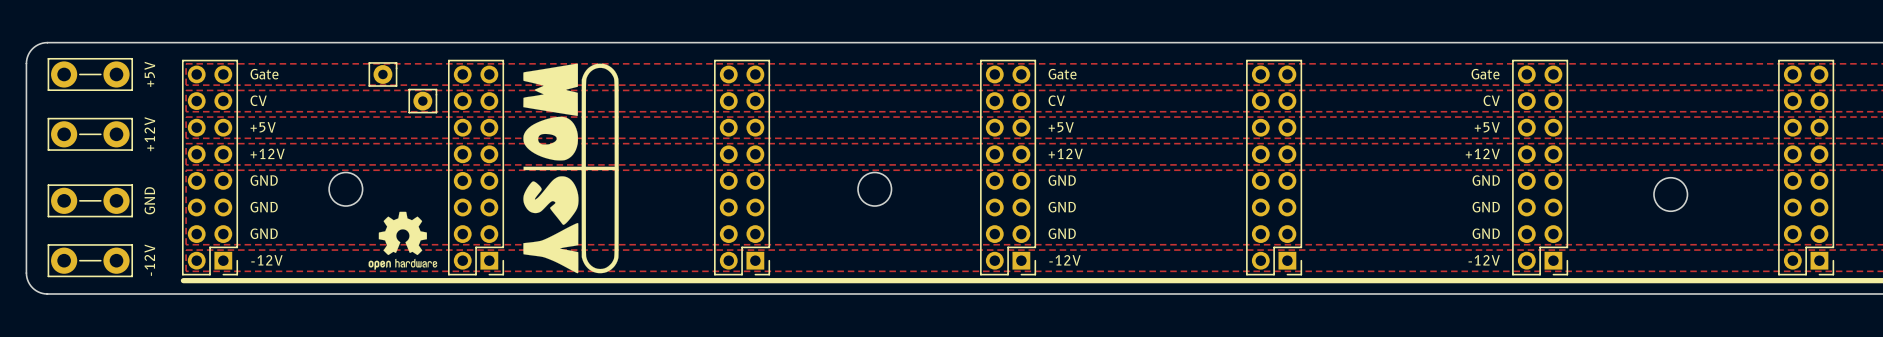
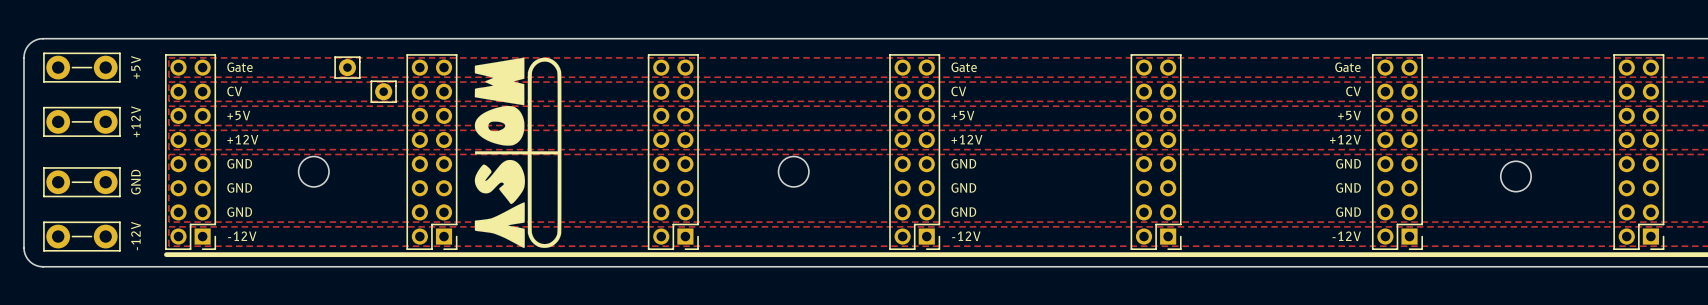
drawing: [368, 211, 438, 270] -> none

